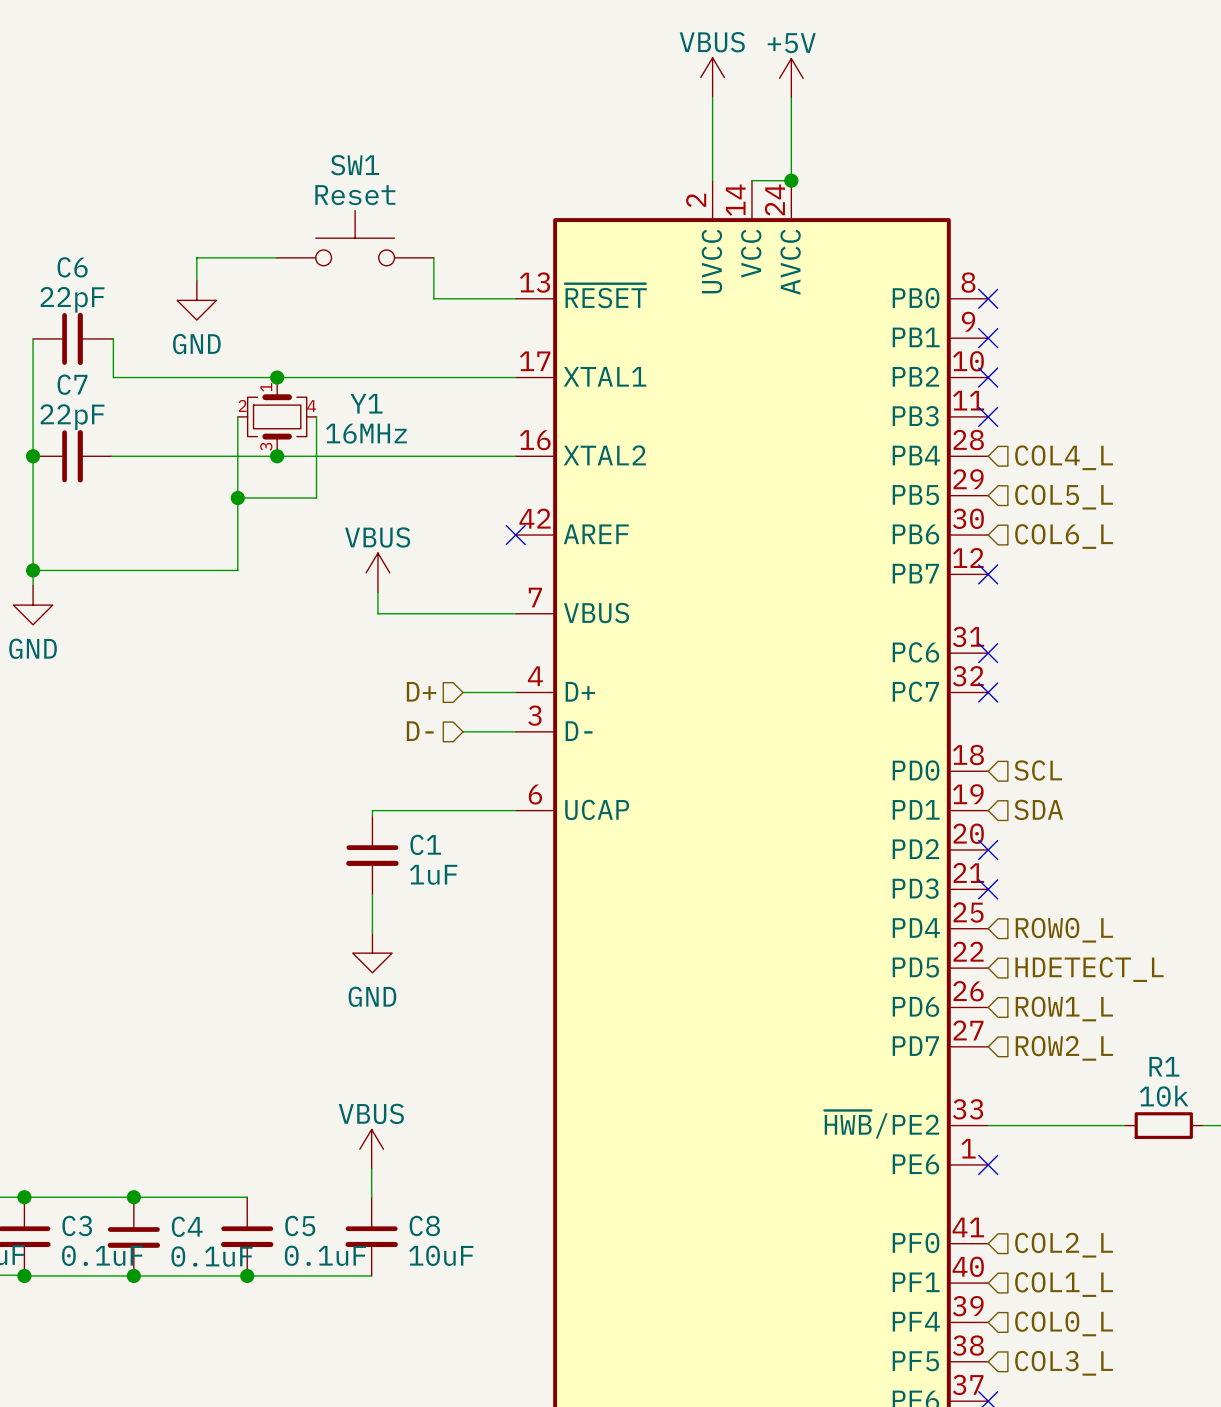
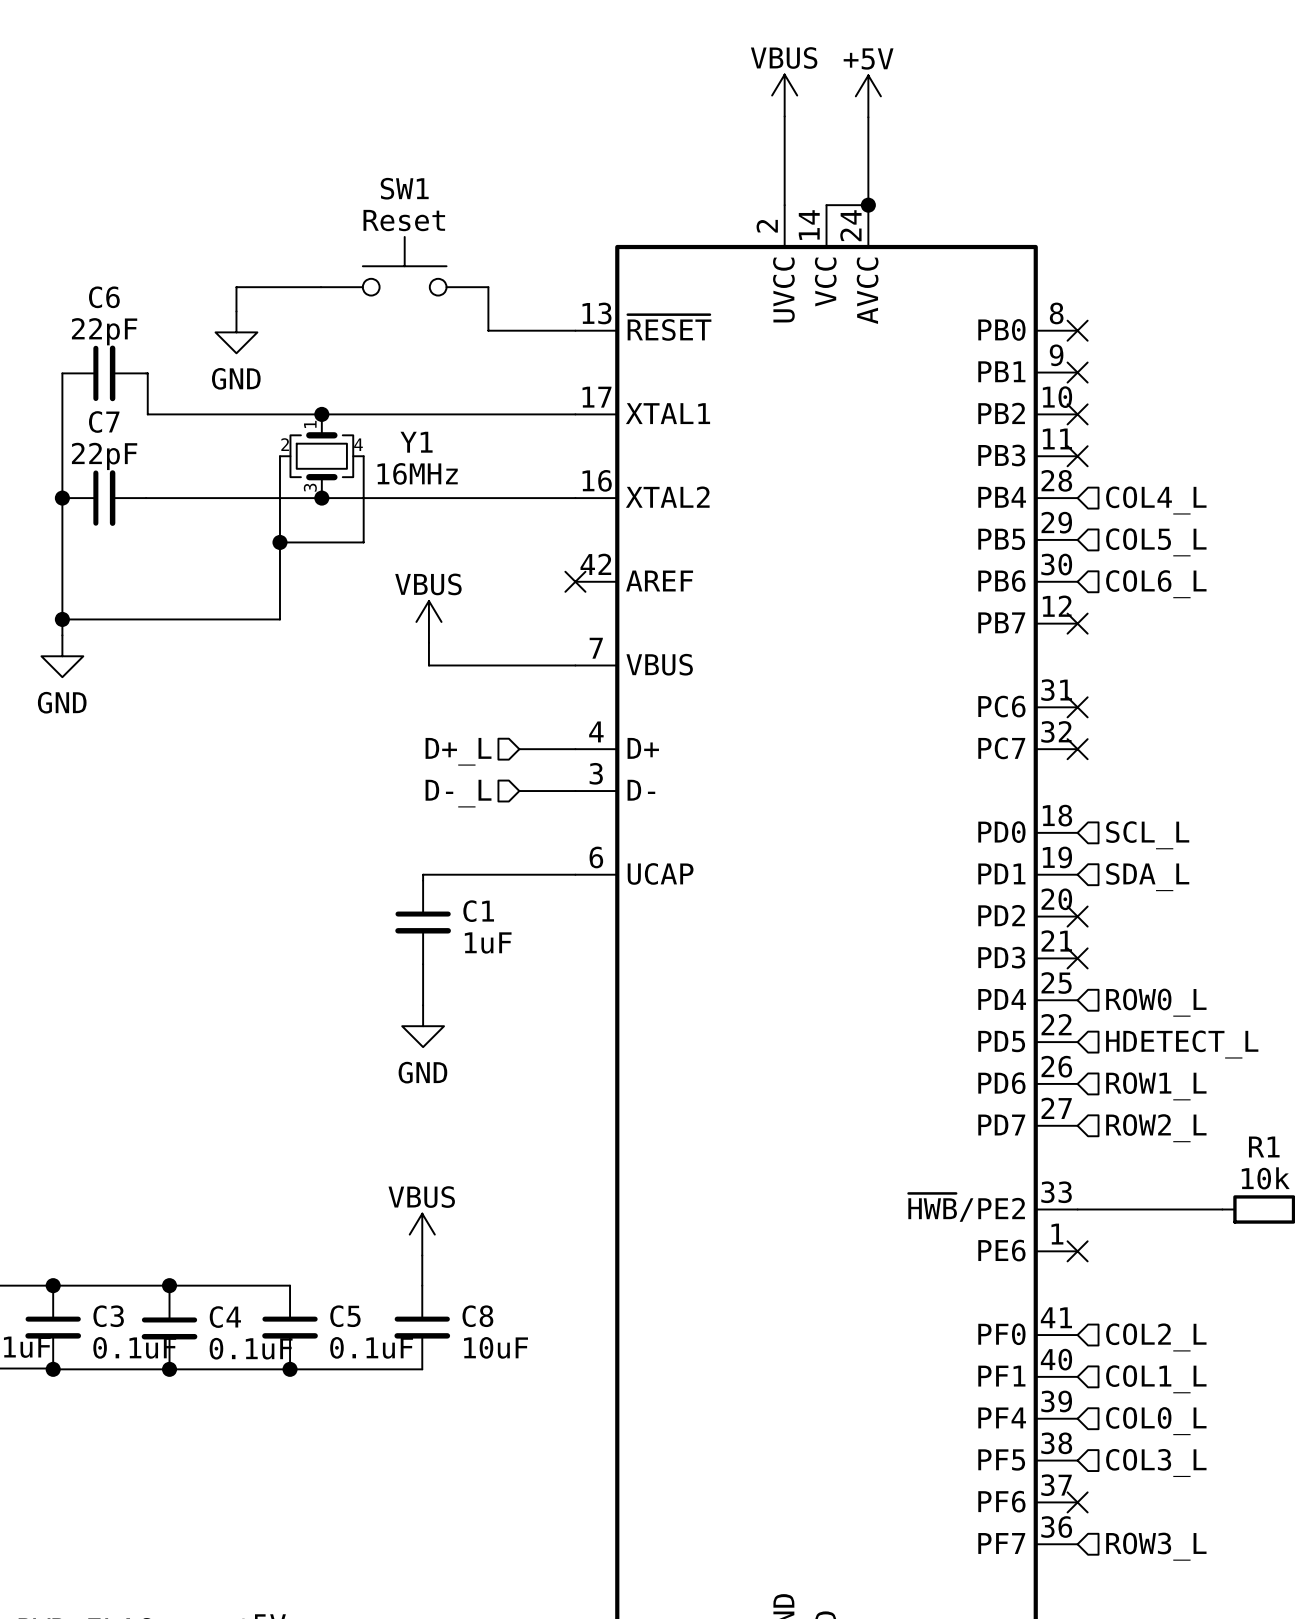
hierarchical label: D+ (421, 691) -> D+_L (458, 751)
hierarchical label: D- (420, 731) -> D-_L (458, 793)
hierarchical label: SCL (1038, 770) -> SCL_L (1147, 835)
hierarchical label: SDA (1038, 809) -> SDA_L (1147, 877)

